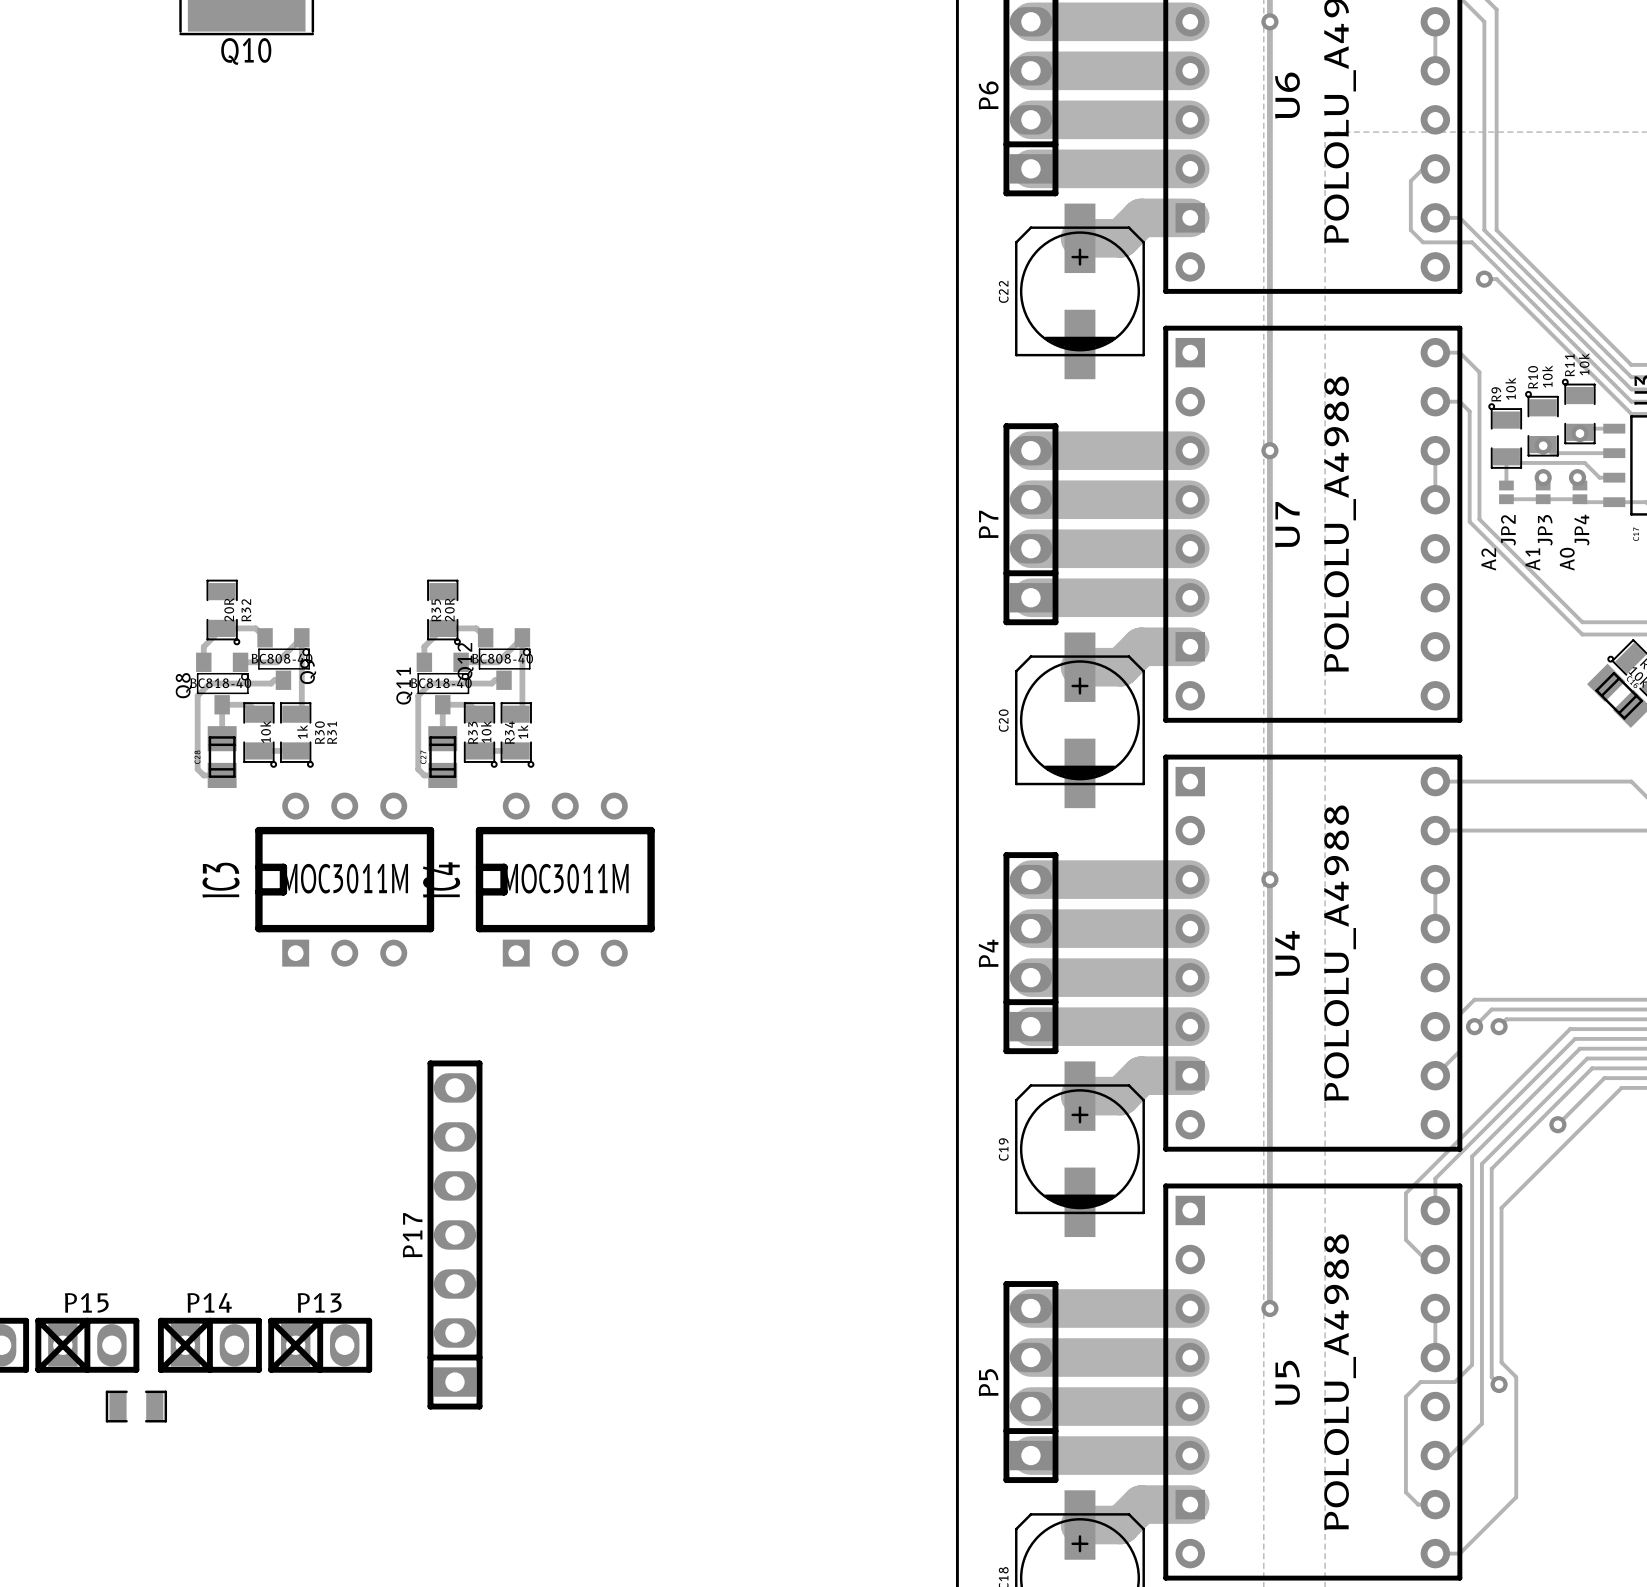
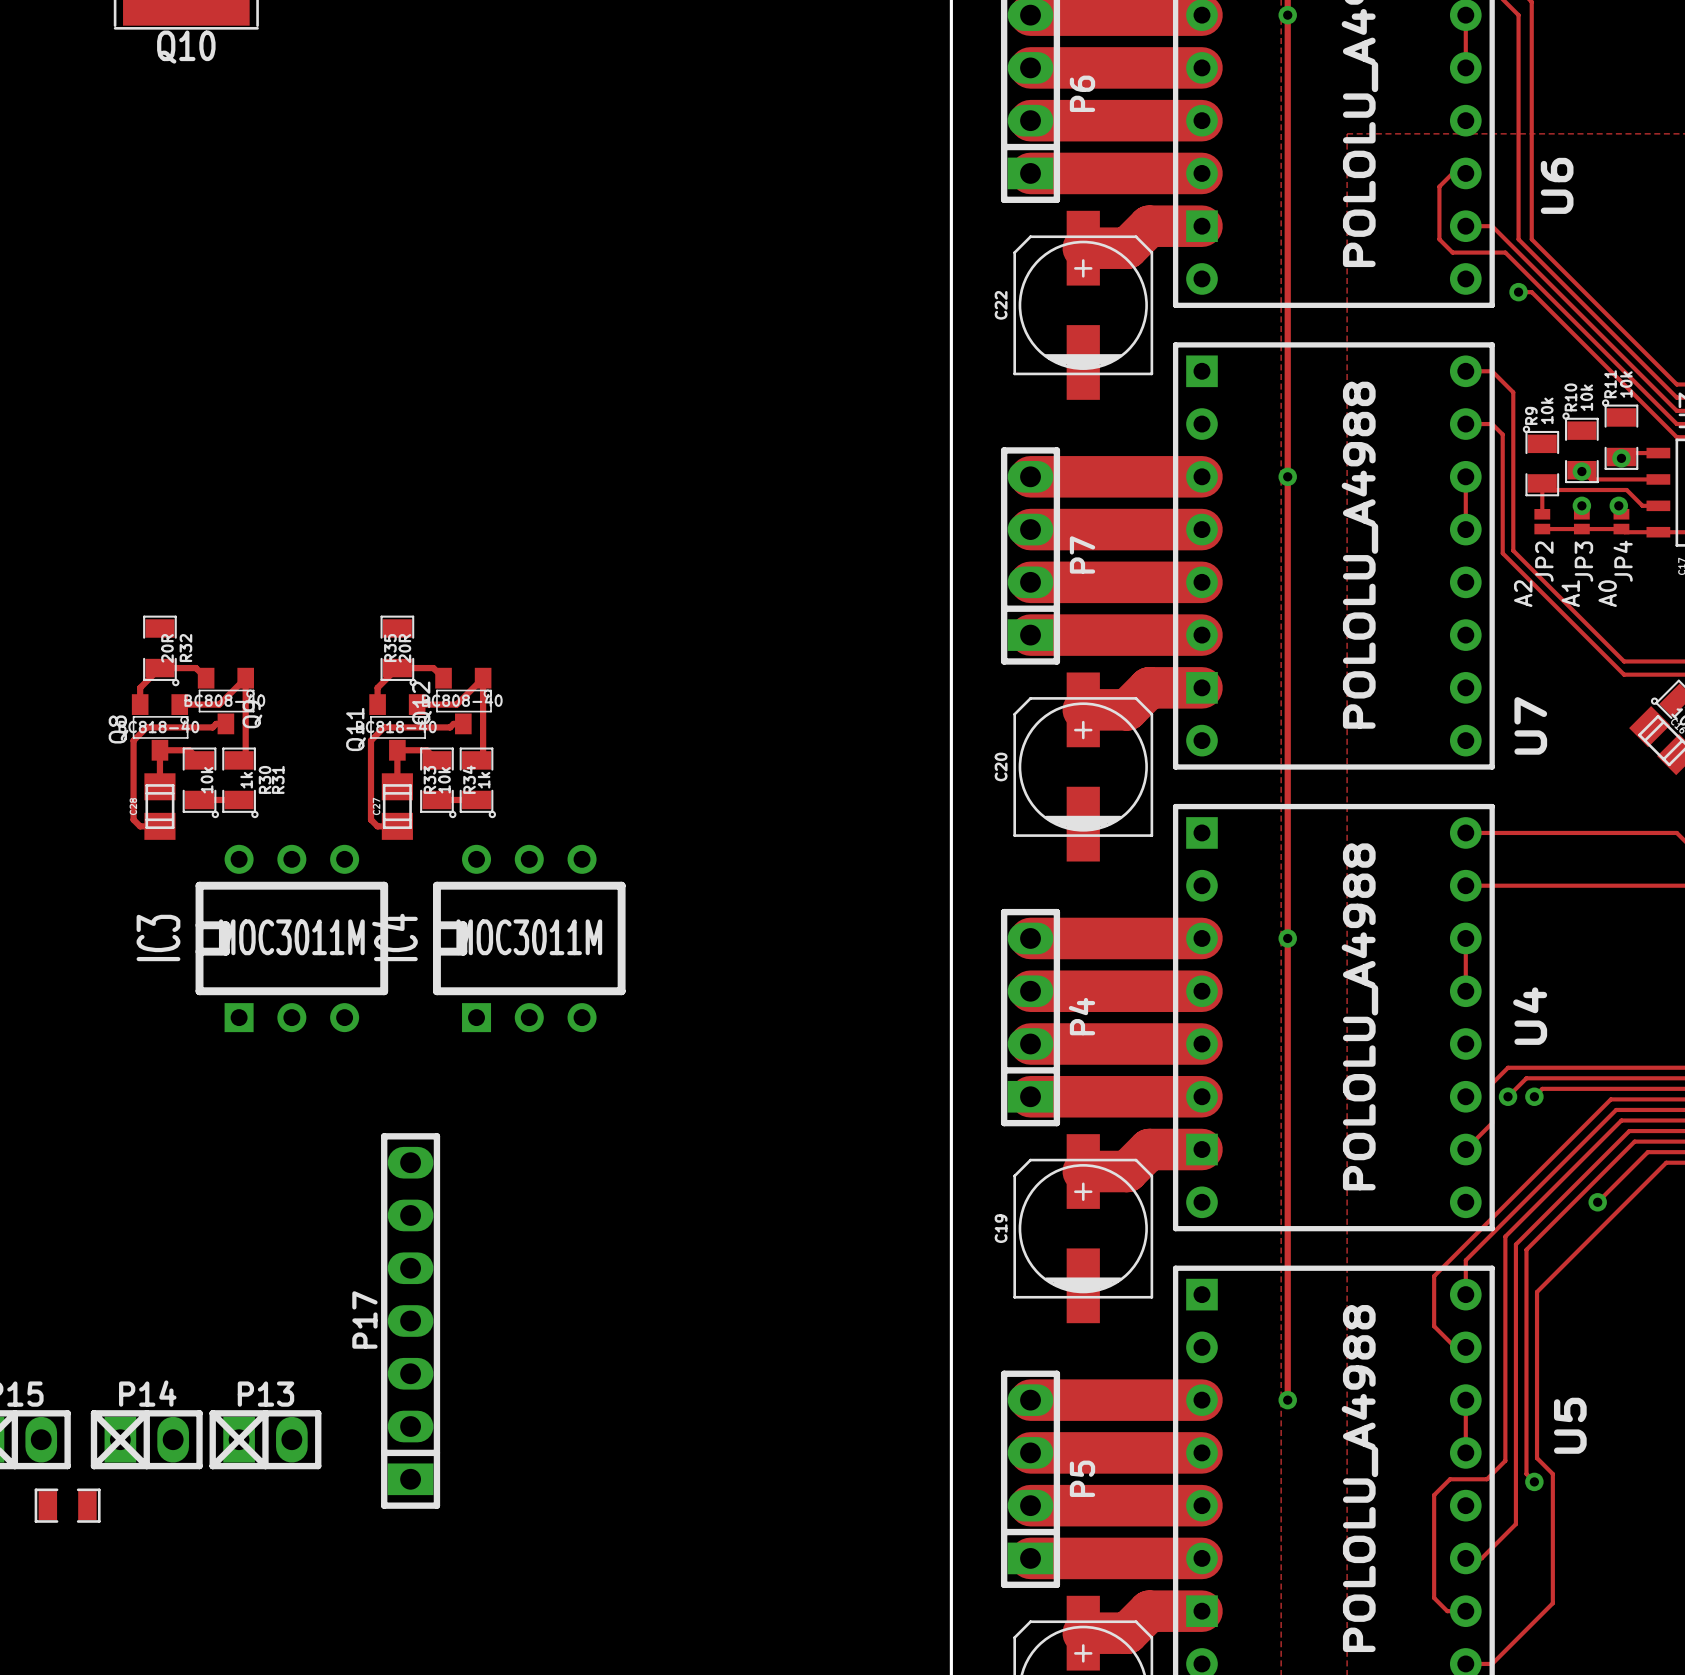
P6 name position: P6 (988, 95) -> P6 (1082, 93)
U6 name position: U6 (1287, 95) -> U6 (1557, 185)
P7 name position: P7 (988, 524) -> P7 (1082, 554)
U7 name position: U7 (1287, 524) -> U7 (1530, 725)
P4 name position: P4 (988, 953) -> P4 (1081, 1016)
U4 name position: U4 (1287, 953) -> U4 (1530, 1016)
P5 name position: P5 (988, 1382) -> P5 (1082, 1478)
U5 name position: U5 (1287, 1383) -> U5 (1570, 1425)

